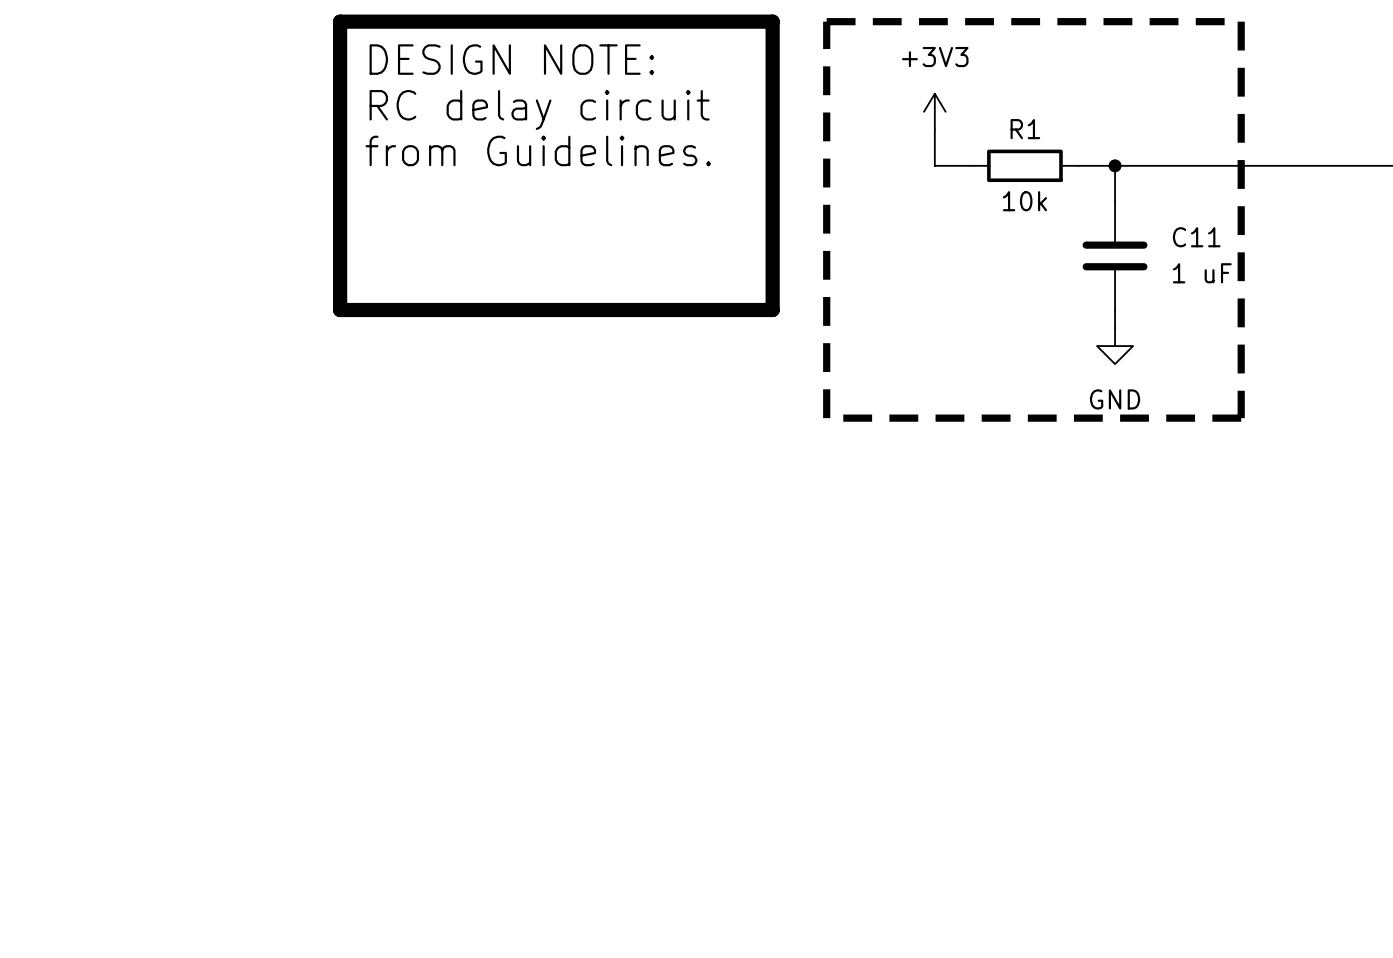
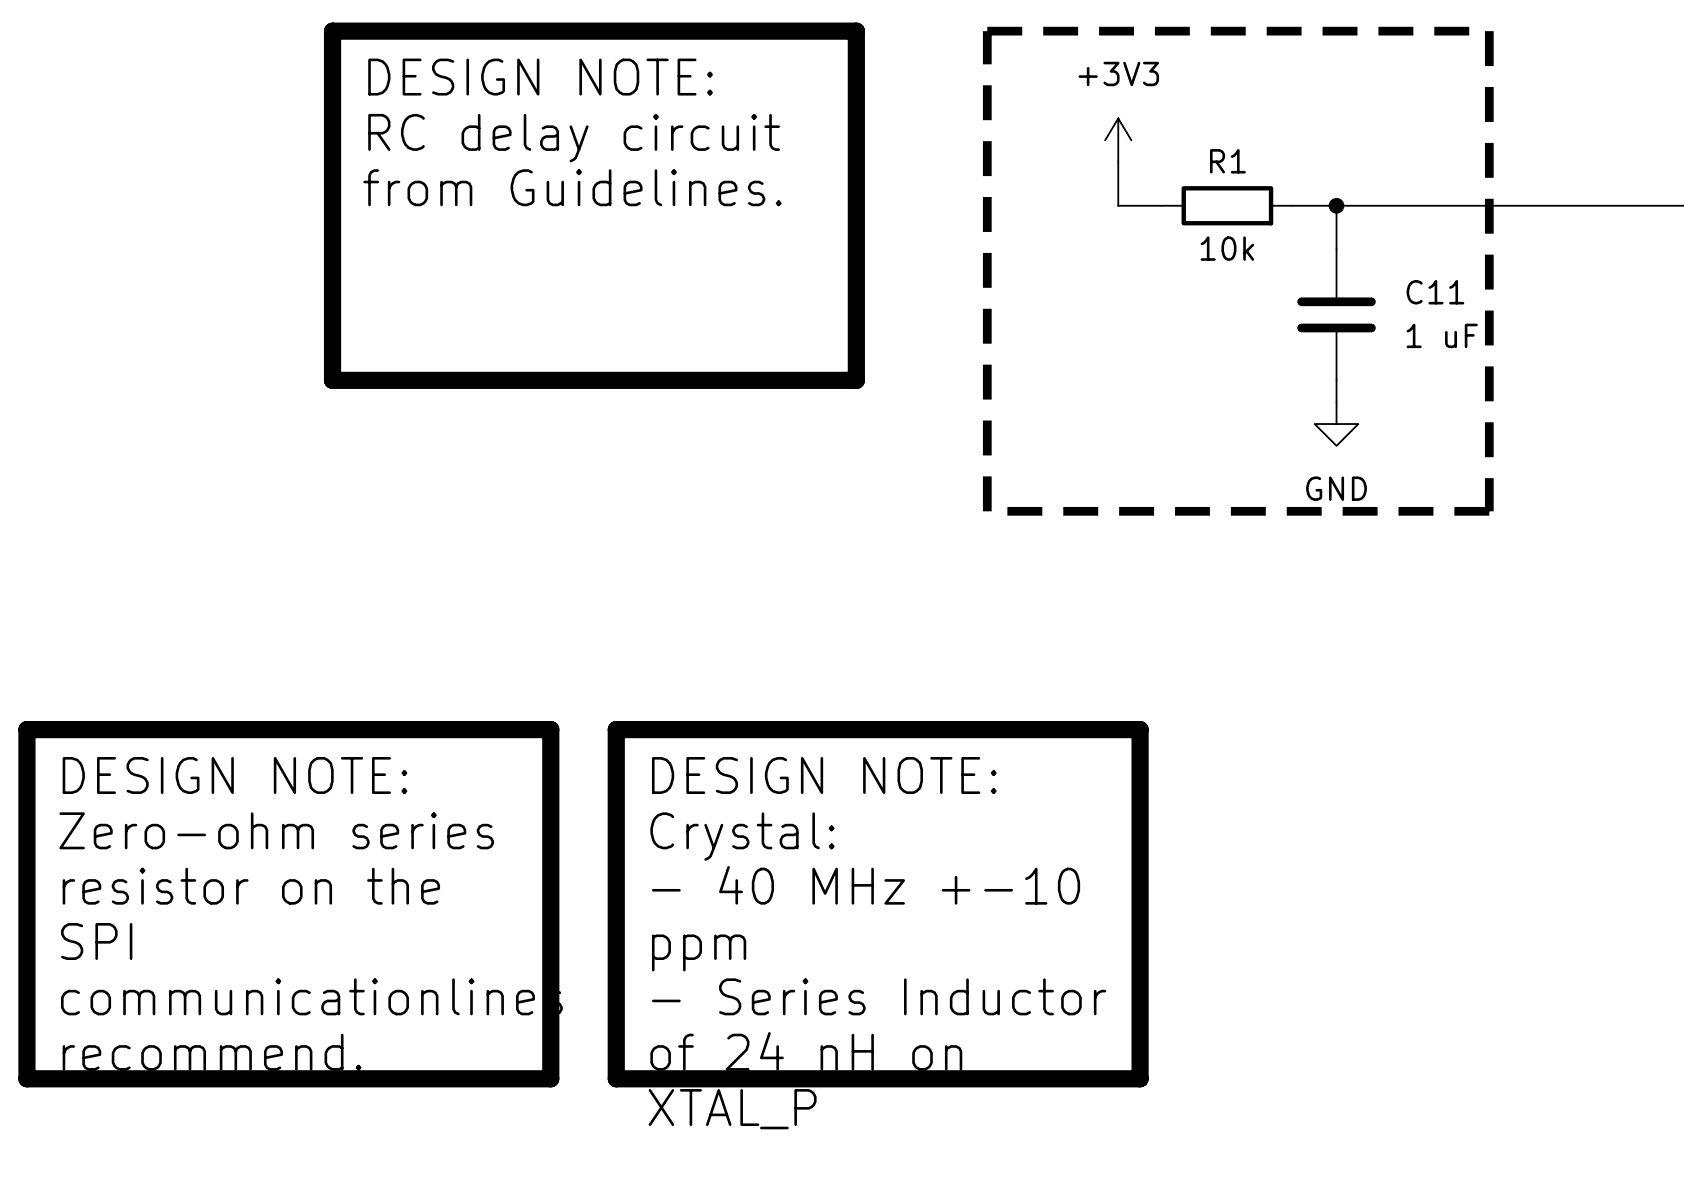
line: (340, 21) (340, 310) -> (398, 31) (332, 31) (332, 380) (398, 380)
line: (718, 21) (772, 21) (772, 310) (718, 310) -> (856, 31) (856, 380)
text position: DESIGN NOTE: (511, 59) -> DESIGN NOTE: (540, 77)
text position: RC delay circuit (539, 109) -> RC delay circuit (574, 138)
text position: from Guidelines. (538, 150) -> from Guidelines. (572, 187)
line: none -> (26, 729) (550, 729) (550, 1078) (26, 1078) (26, 729)
line: none -> (616, 729) (1140, 729) (1140, 1078) (616, 1078) (616, 729)
text: none -> DESIGN NOTE: (234, 775)
text: none -> DESIGN NOTE: (824, 775)
text: none -> Zero-ohm series (276, 830)
text: none -> Crystal: (742, 836)
text: none -> - 40 MHz +-10 (866, 885)
text: none -> resistor on the (251, 886)
text: none -> SPI (96, 941)
text: none -> ppm (699, 952)
text: none -> communicationlines (311, 996)
text: none -> - Series Inductor (879, 996)
text: none -> recommend. (212, 1052)
text: none -> of 24 nH on (806, 1051)
text: none -> XTAL_P (732, 1109)

